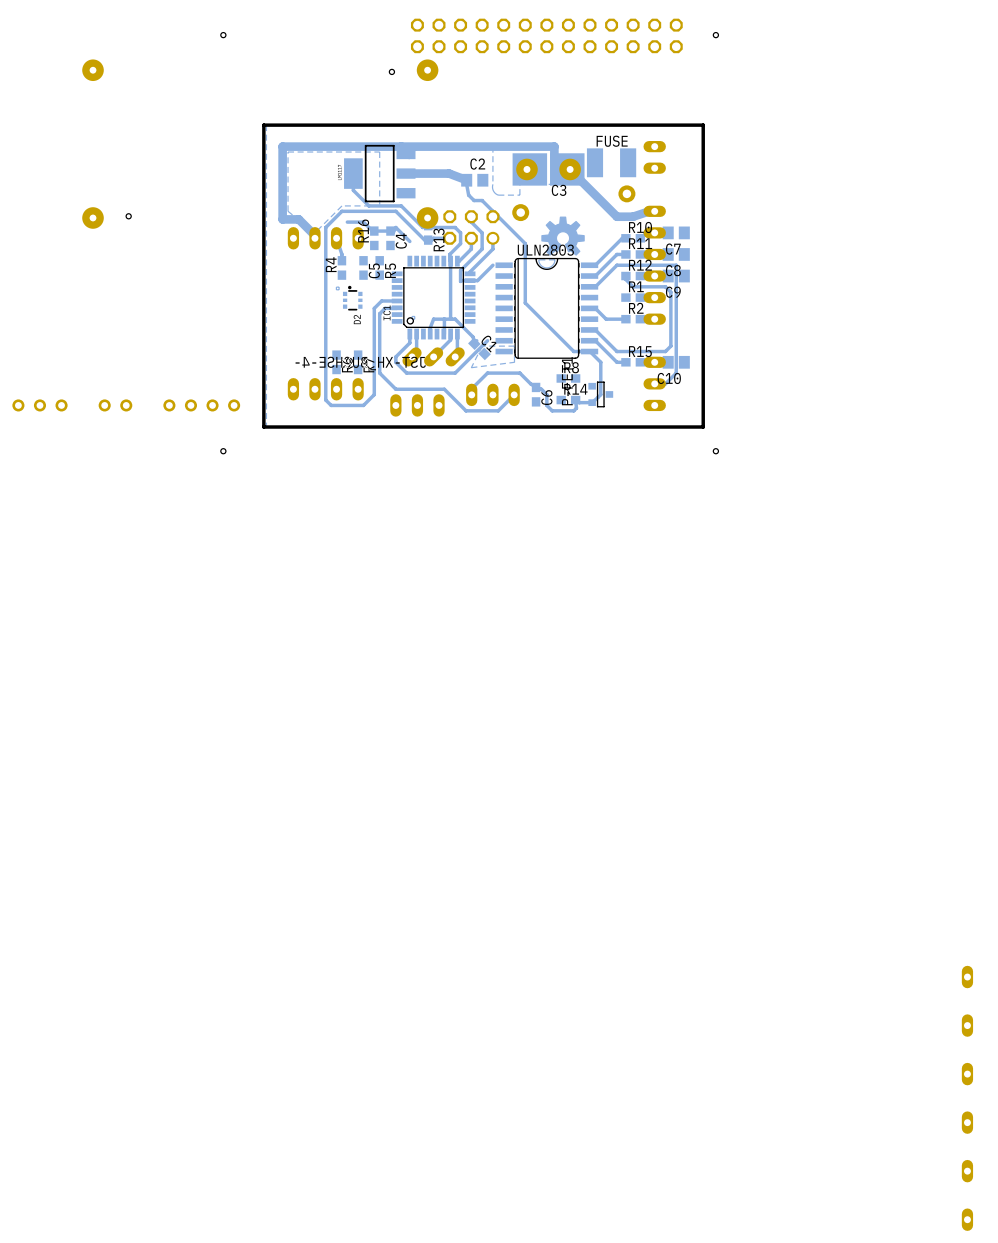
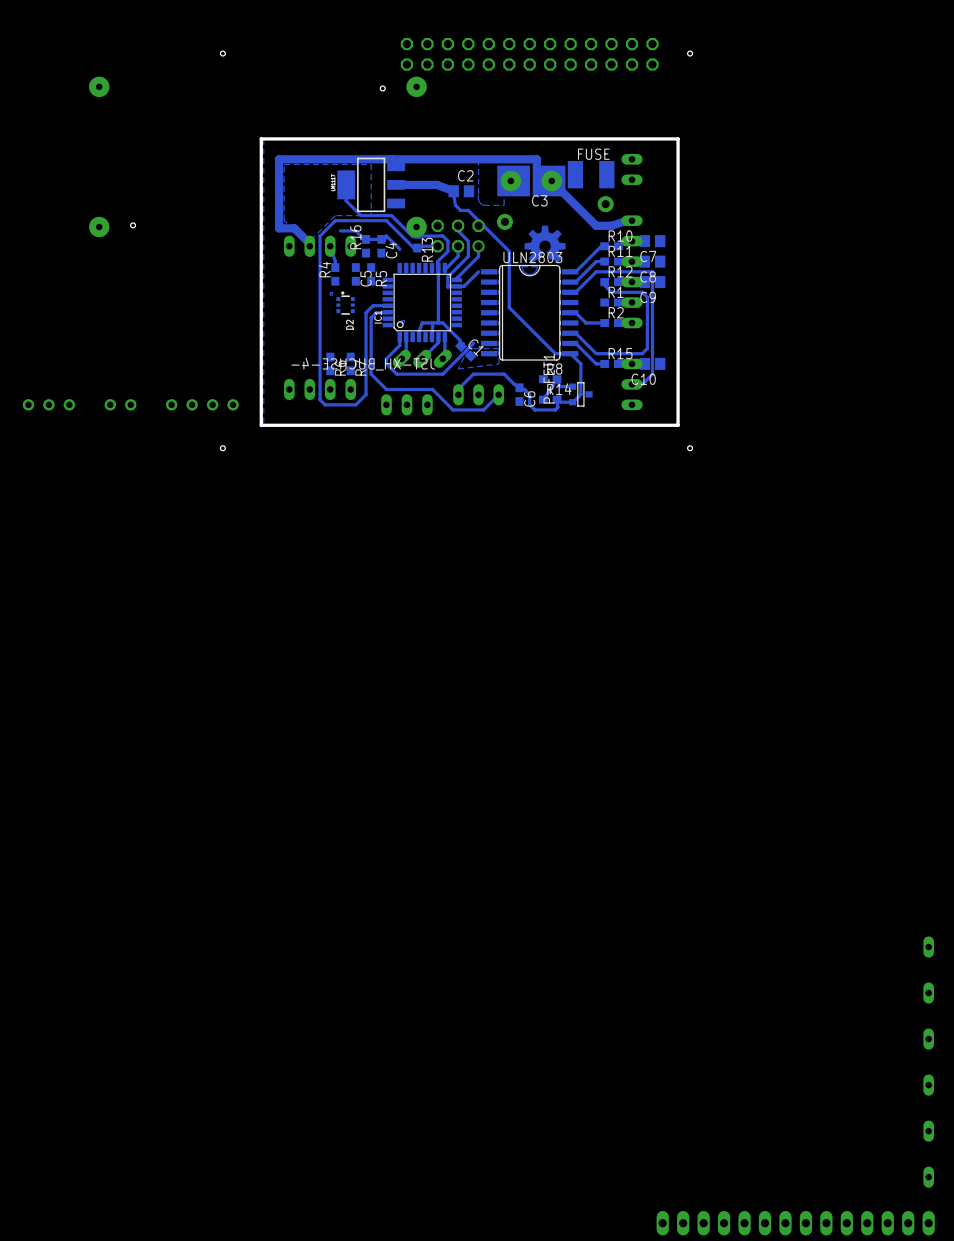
bottom track: none -> (572, 386) (560, 386) (557, 379) (543, 399)

